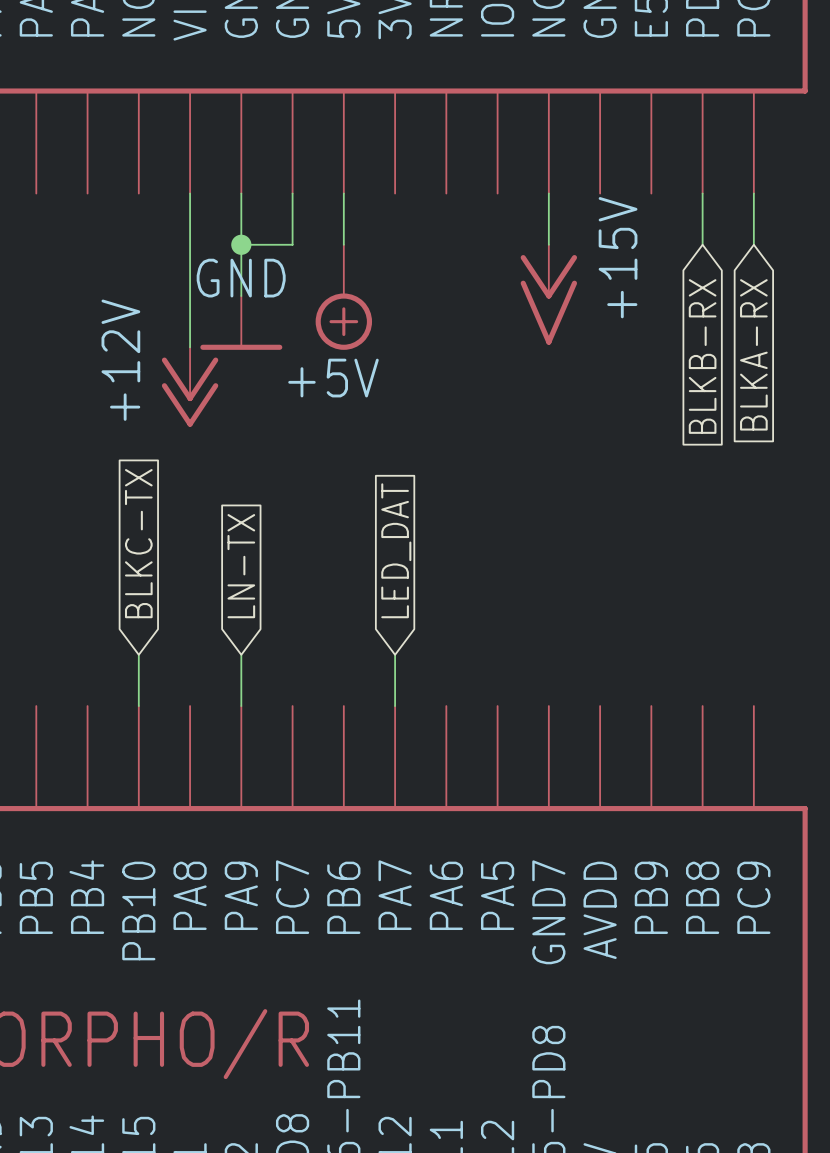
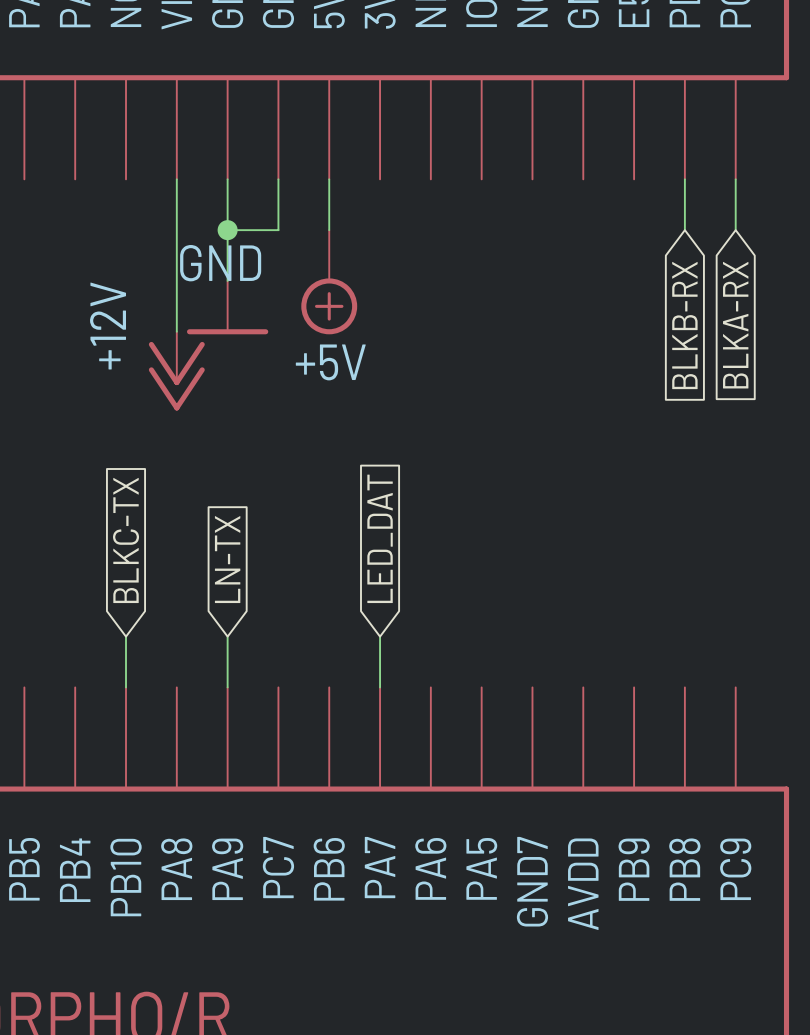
wire: (548, 193) (548, 244) -> none
power symbol: +15V (548, 294) -> none

